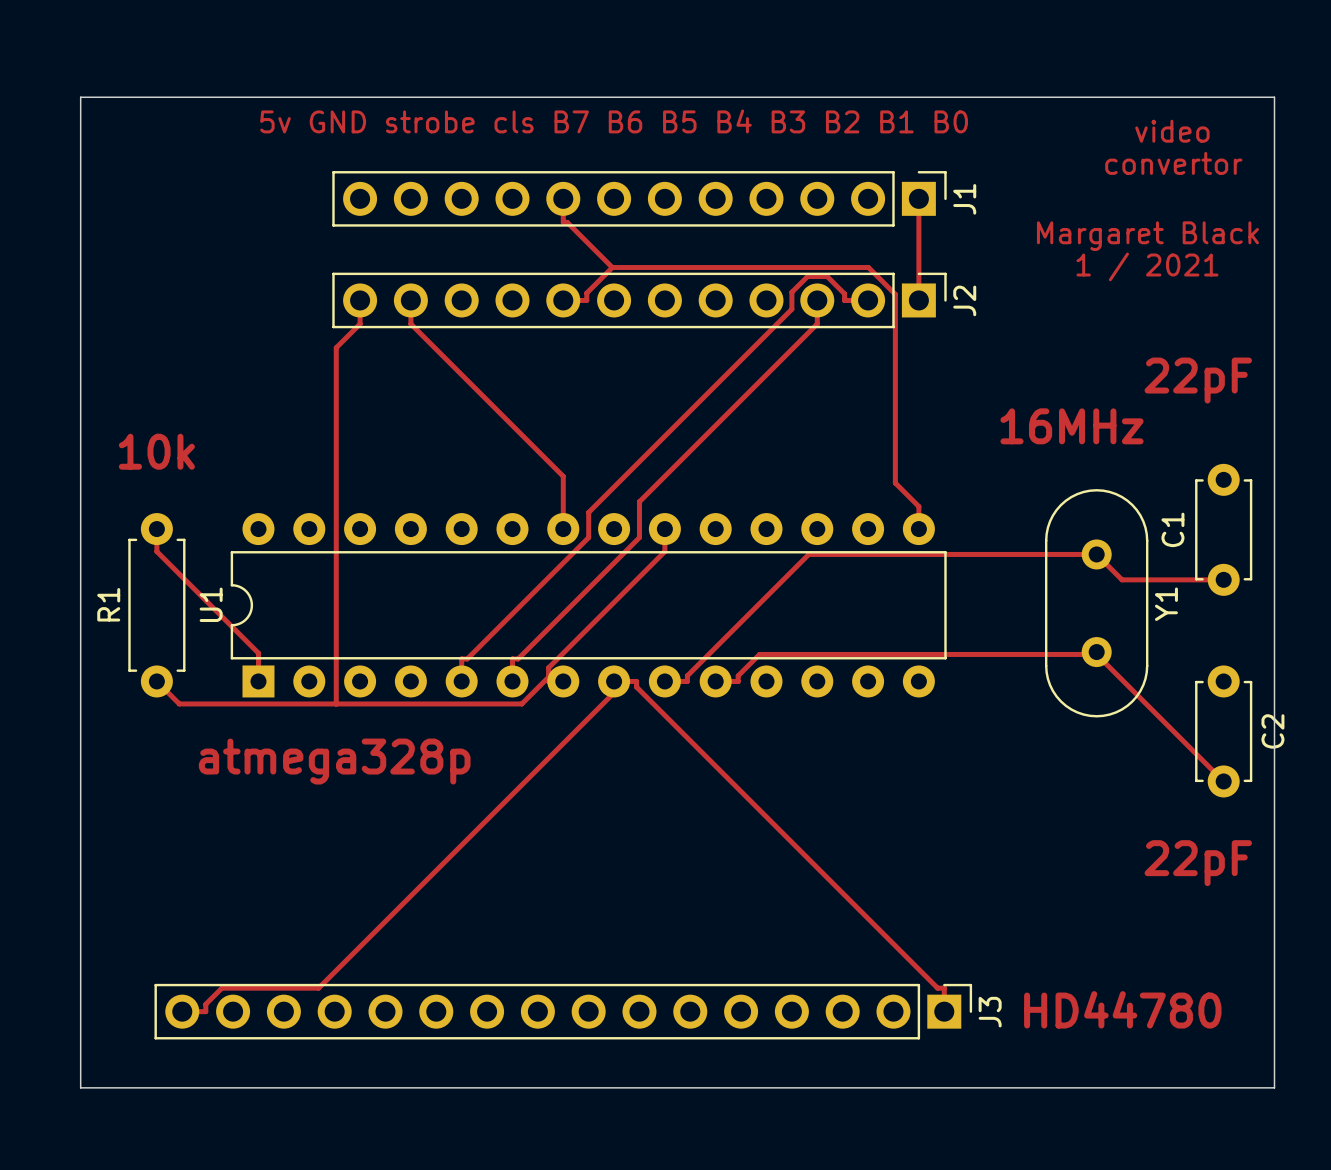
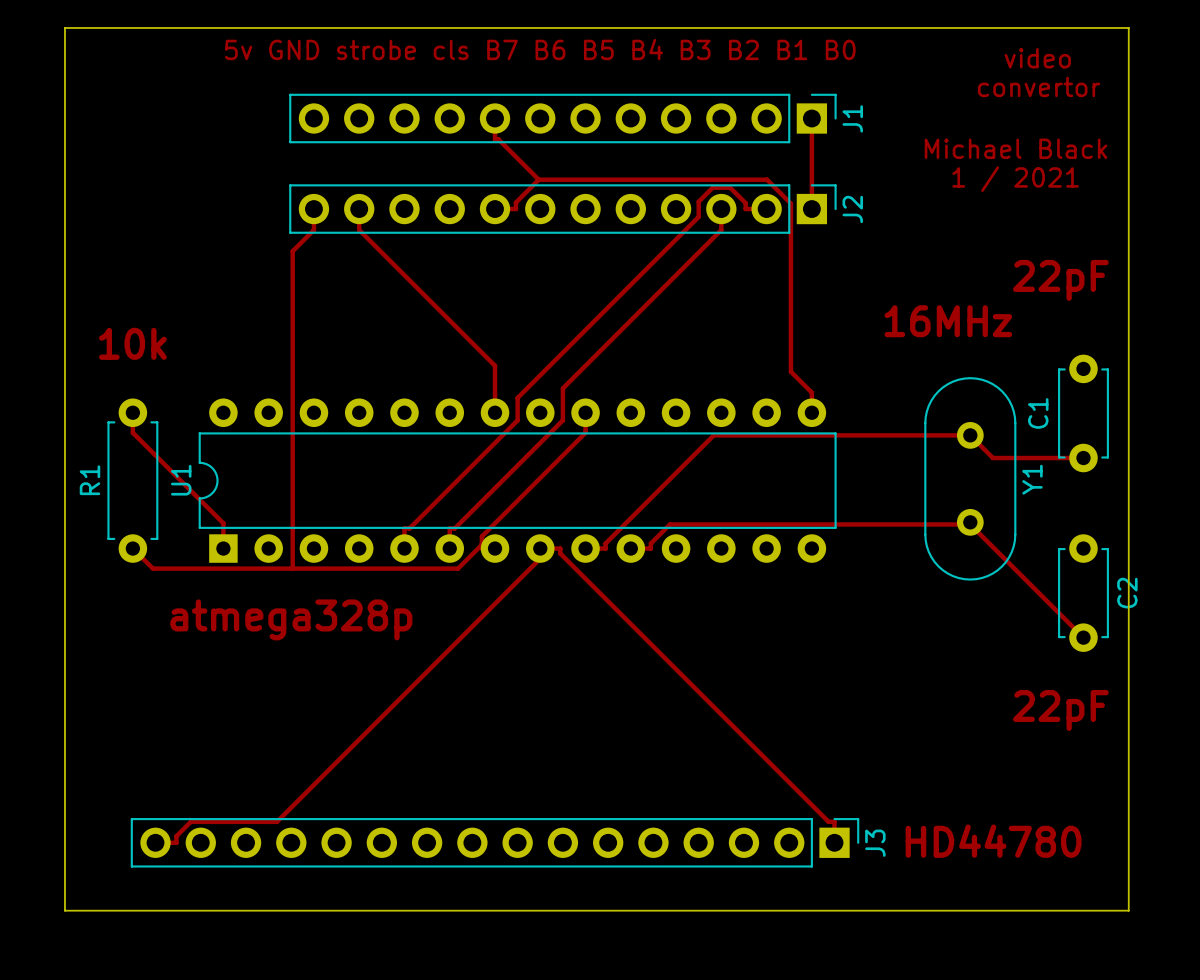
text: Margaret Black (1147, 236) -> Michael Black (1016, 148)

